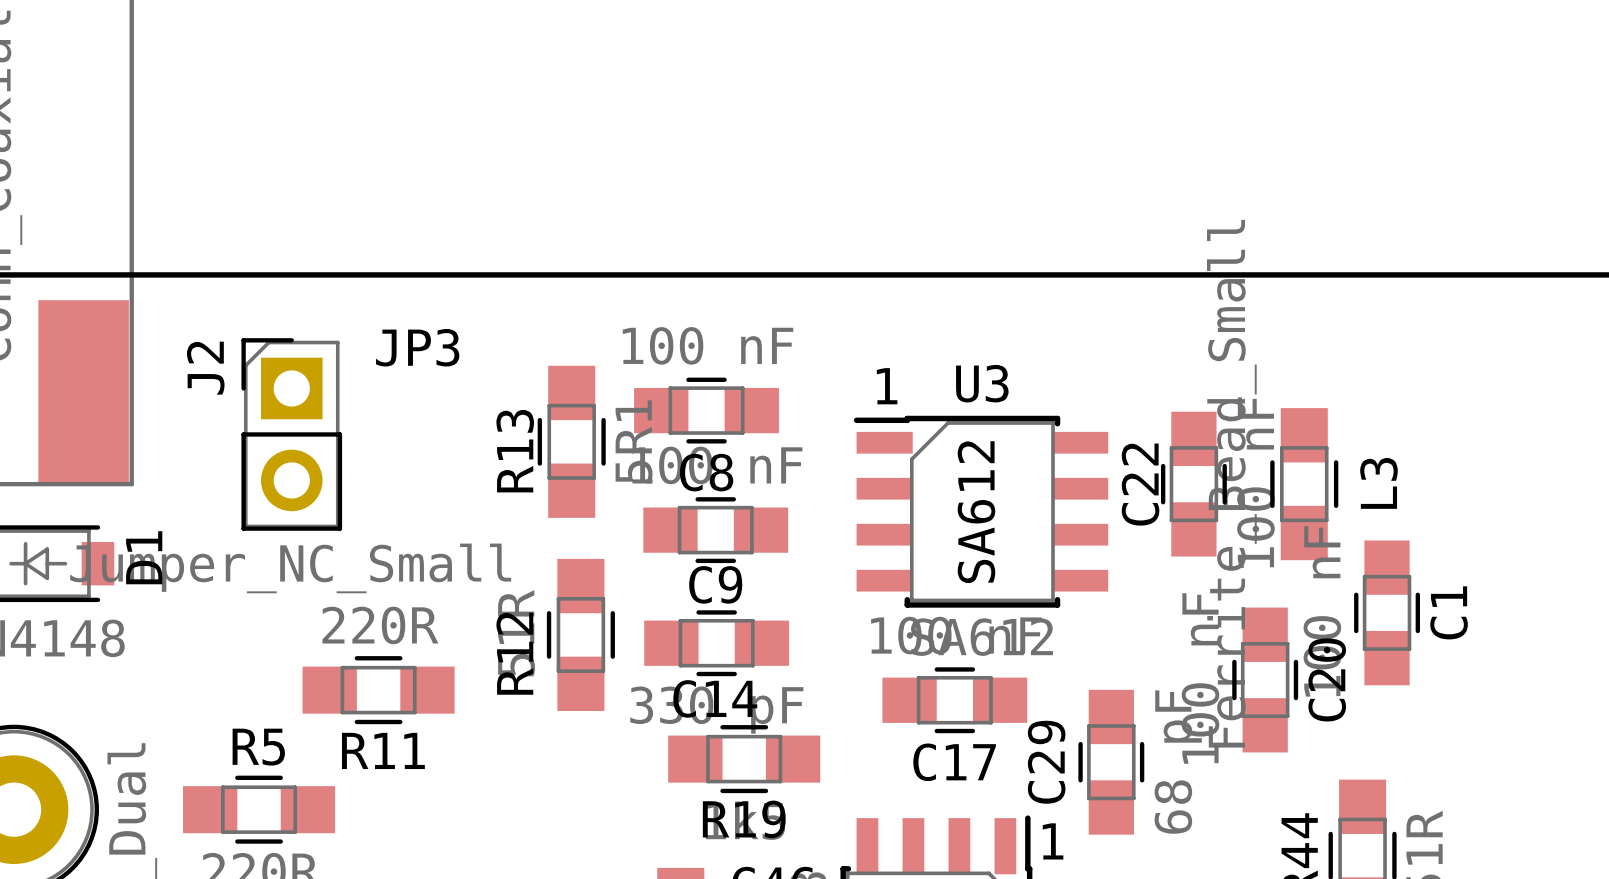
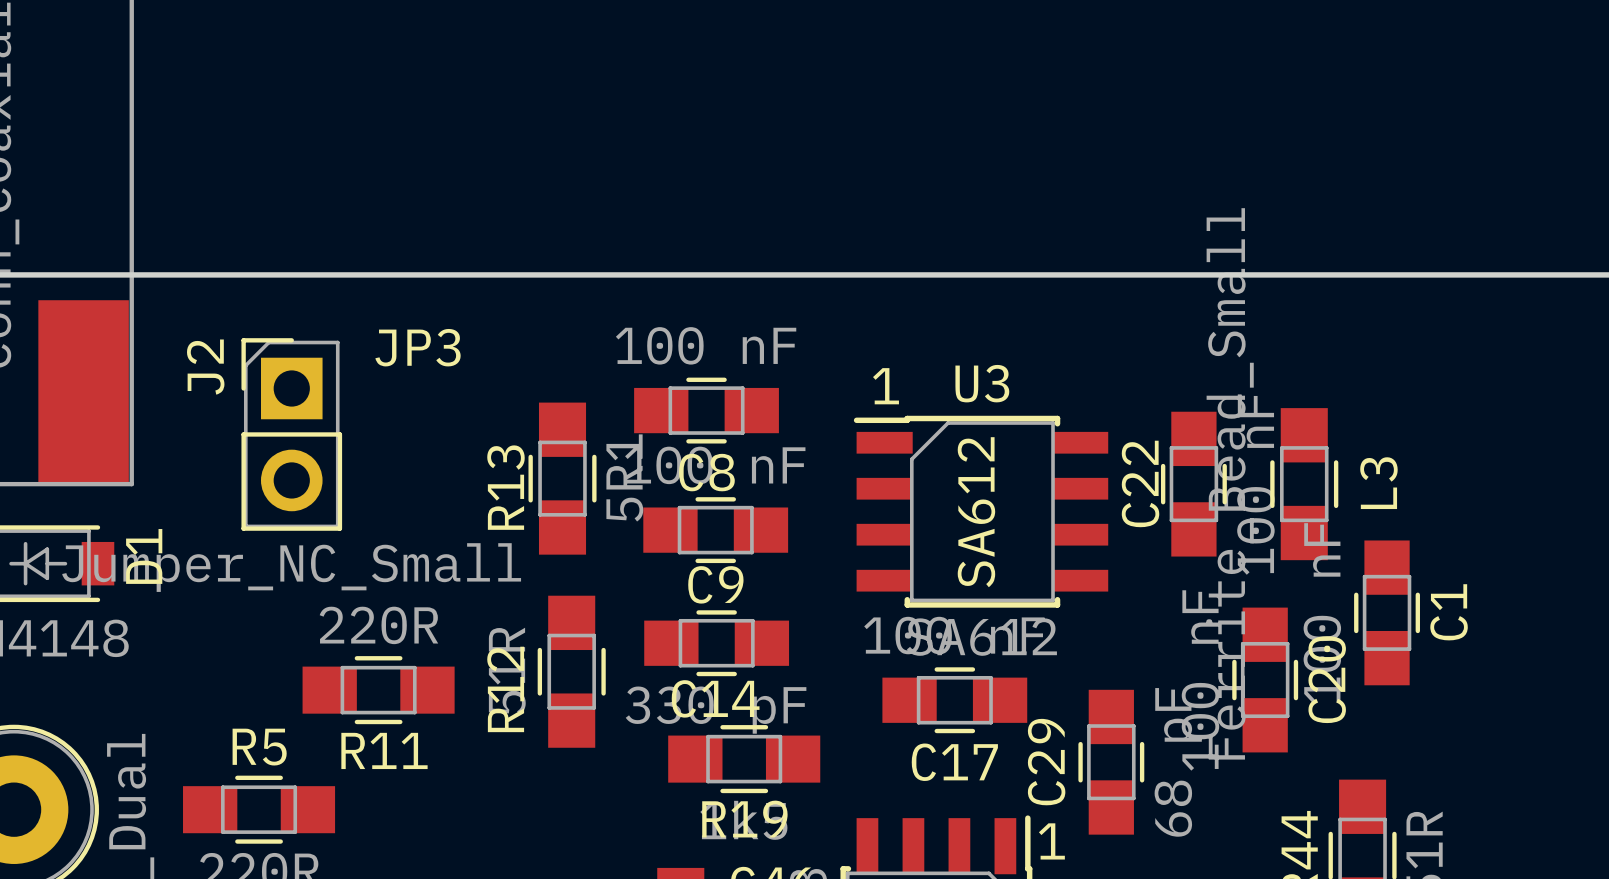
R13 position: (571, 441) -> (562, 478)
R12 position: (580, 634) -> (571, 671)

